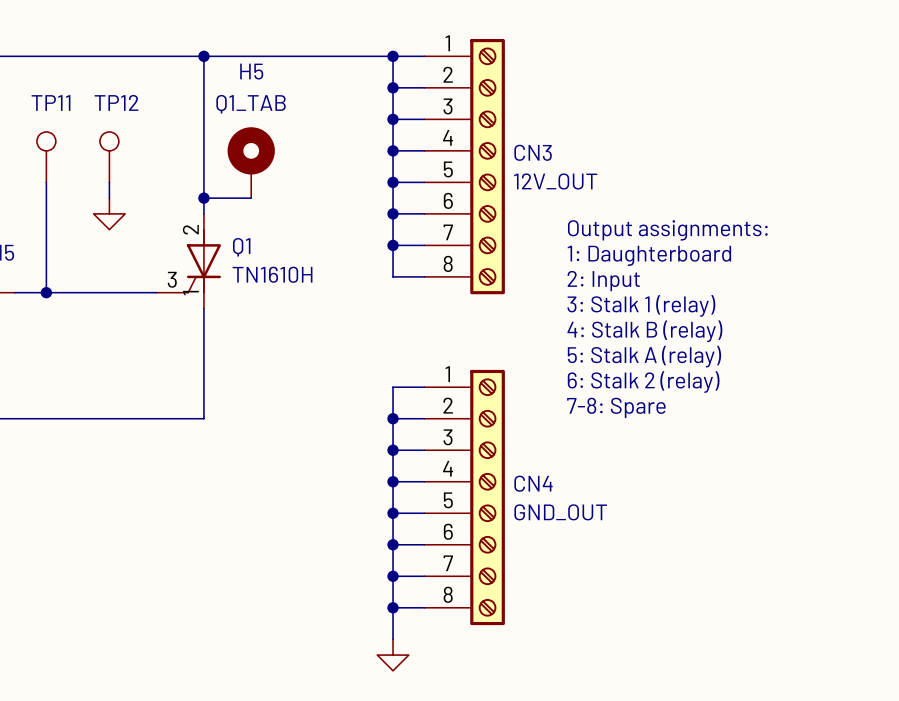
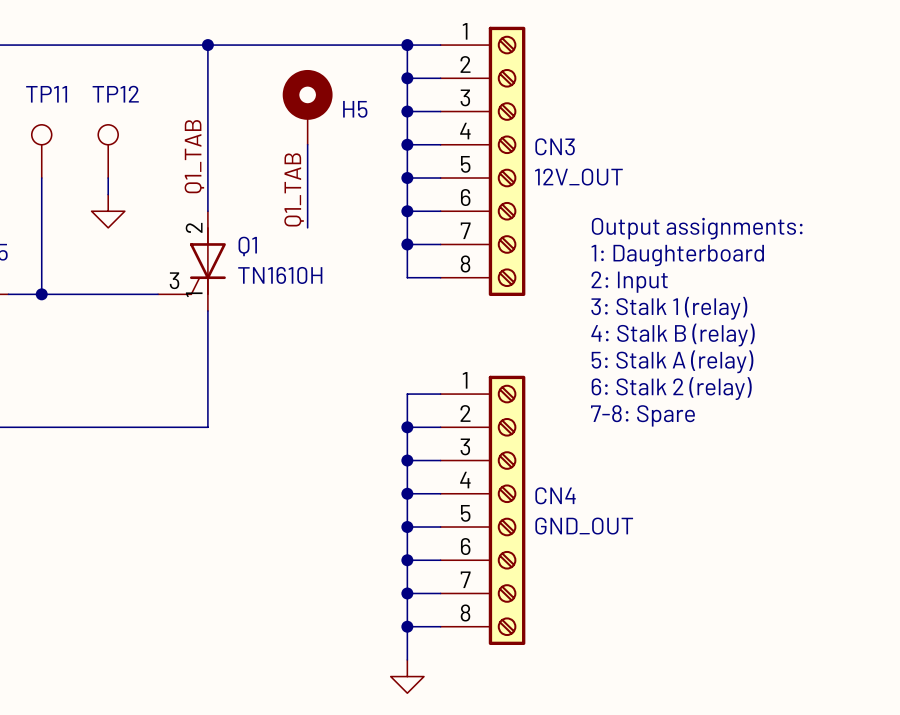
H5 name position: H5 (251, 71) -> H5 (355, 109)
H5 value: Q1_TAB (251, 104) -> none
wire: none -> (307, 144) (307, 227)
label: none -> Q1_TAB (194, 156)
H5 position: (251, 162) -> (307, 107)
label: none -> Q1_TAB (294, 189)
wire: (203, 198) (251, 198) -> none
junction: (203, 198) -> none

